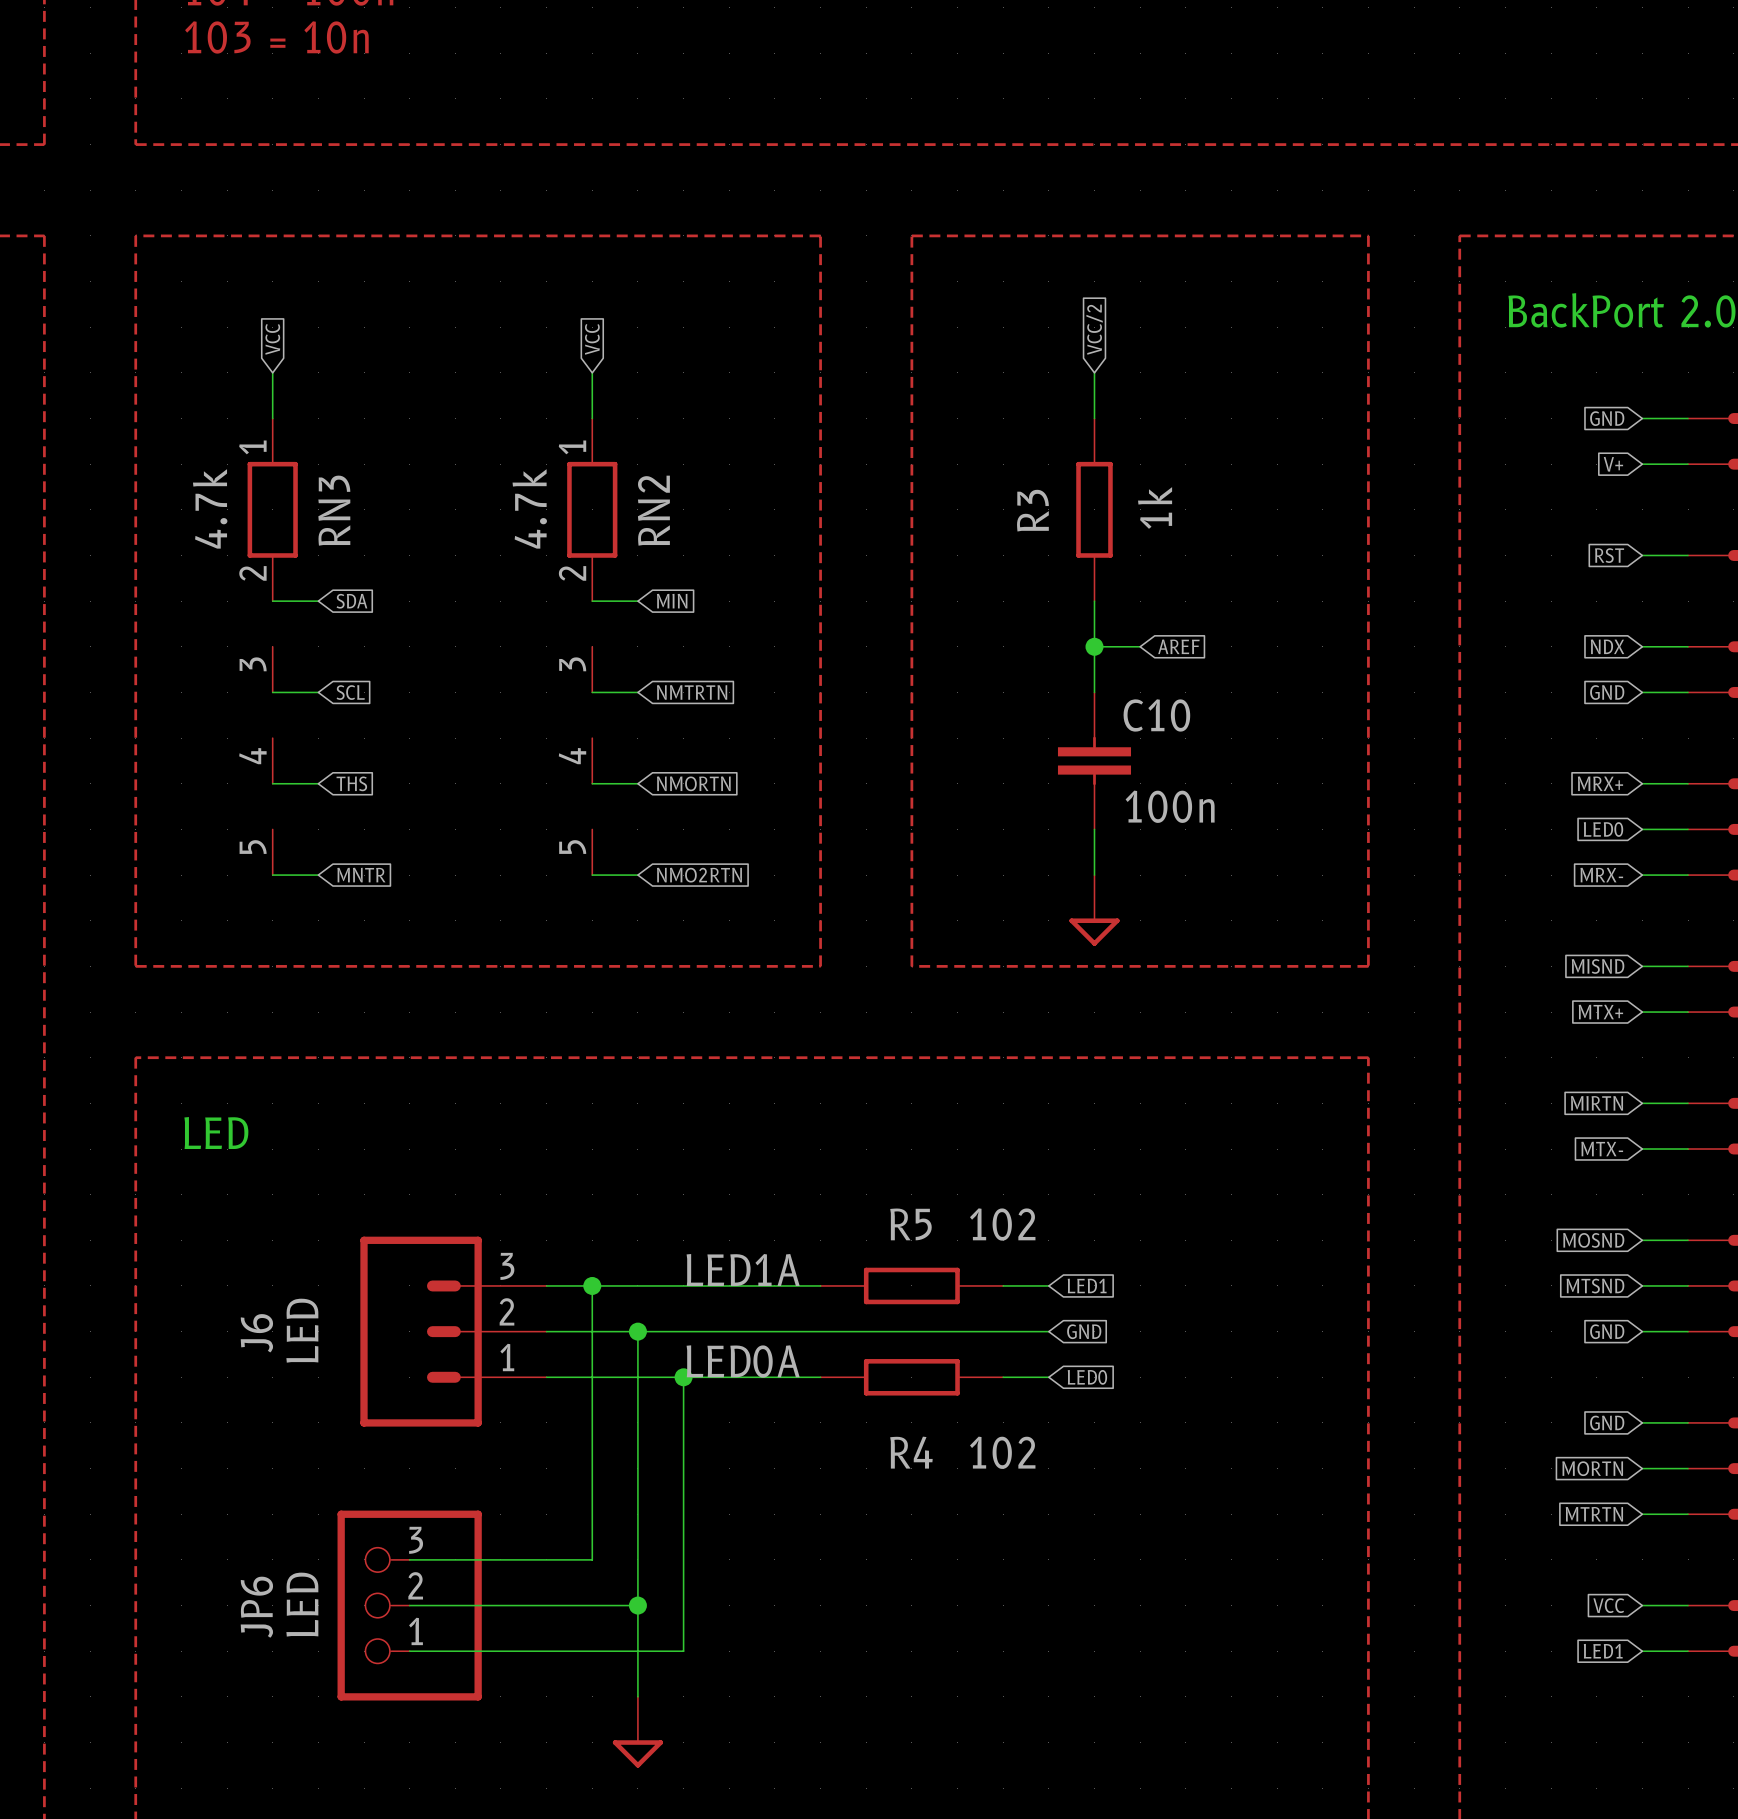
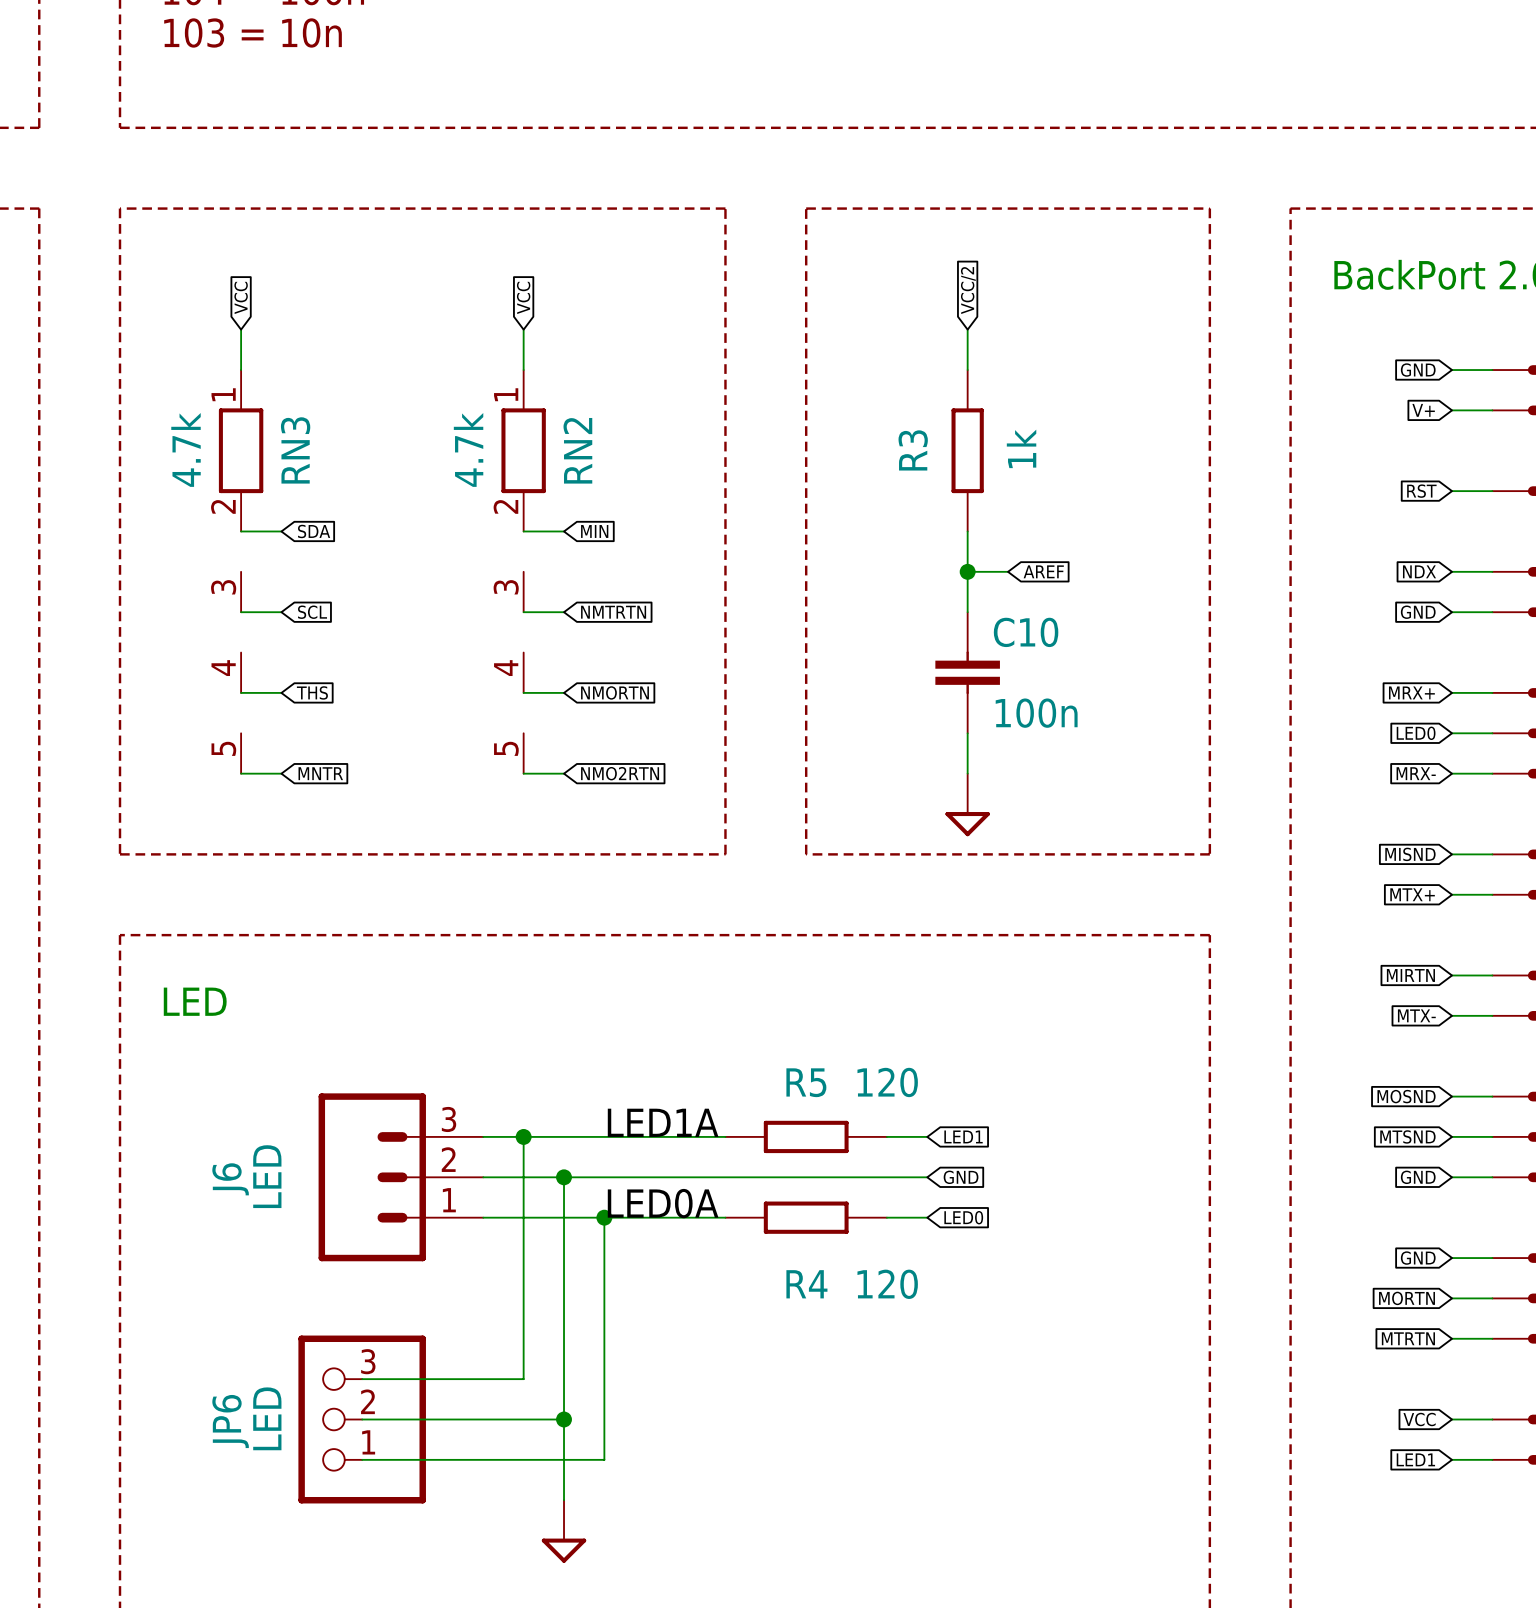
R5 value: 102 (1002, 1224) -> 120 (887, 1082)
R4 value: 102 (1002, 1452) -> 120 (887, 1284)

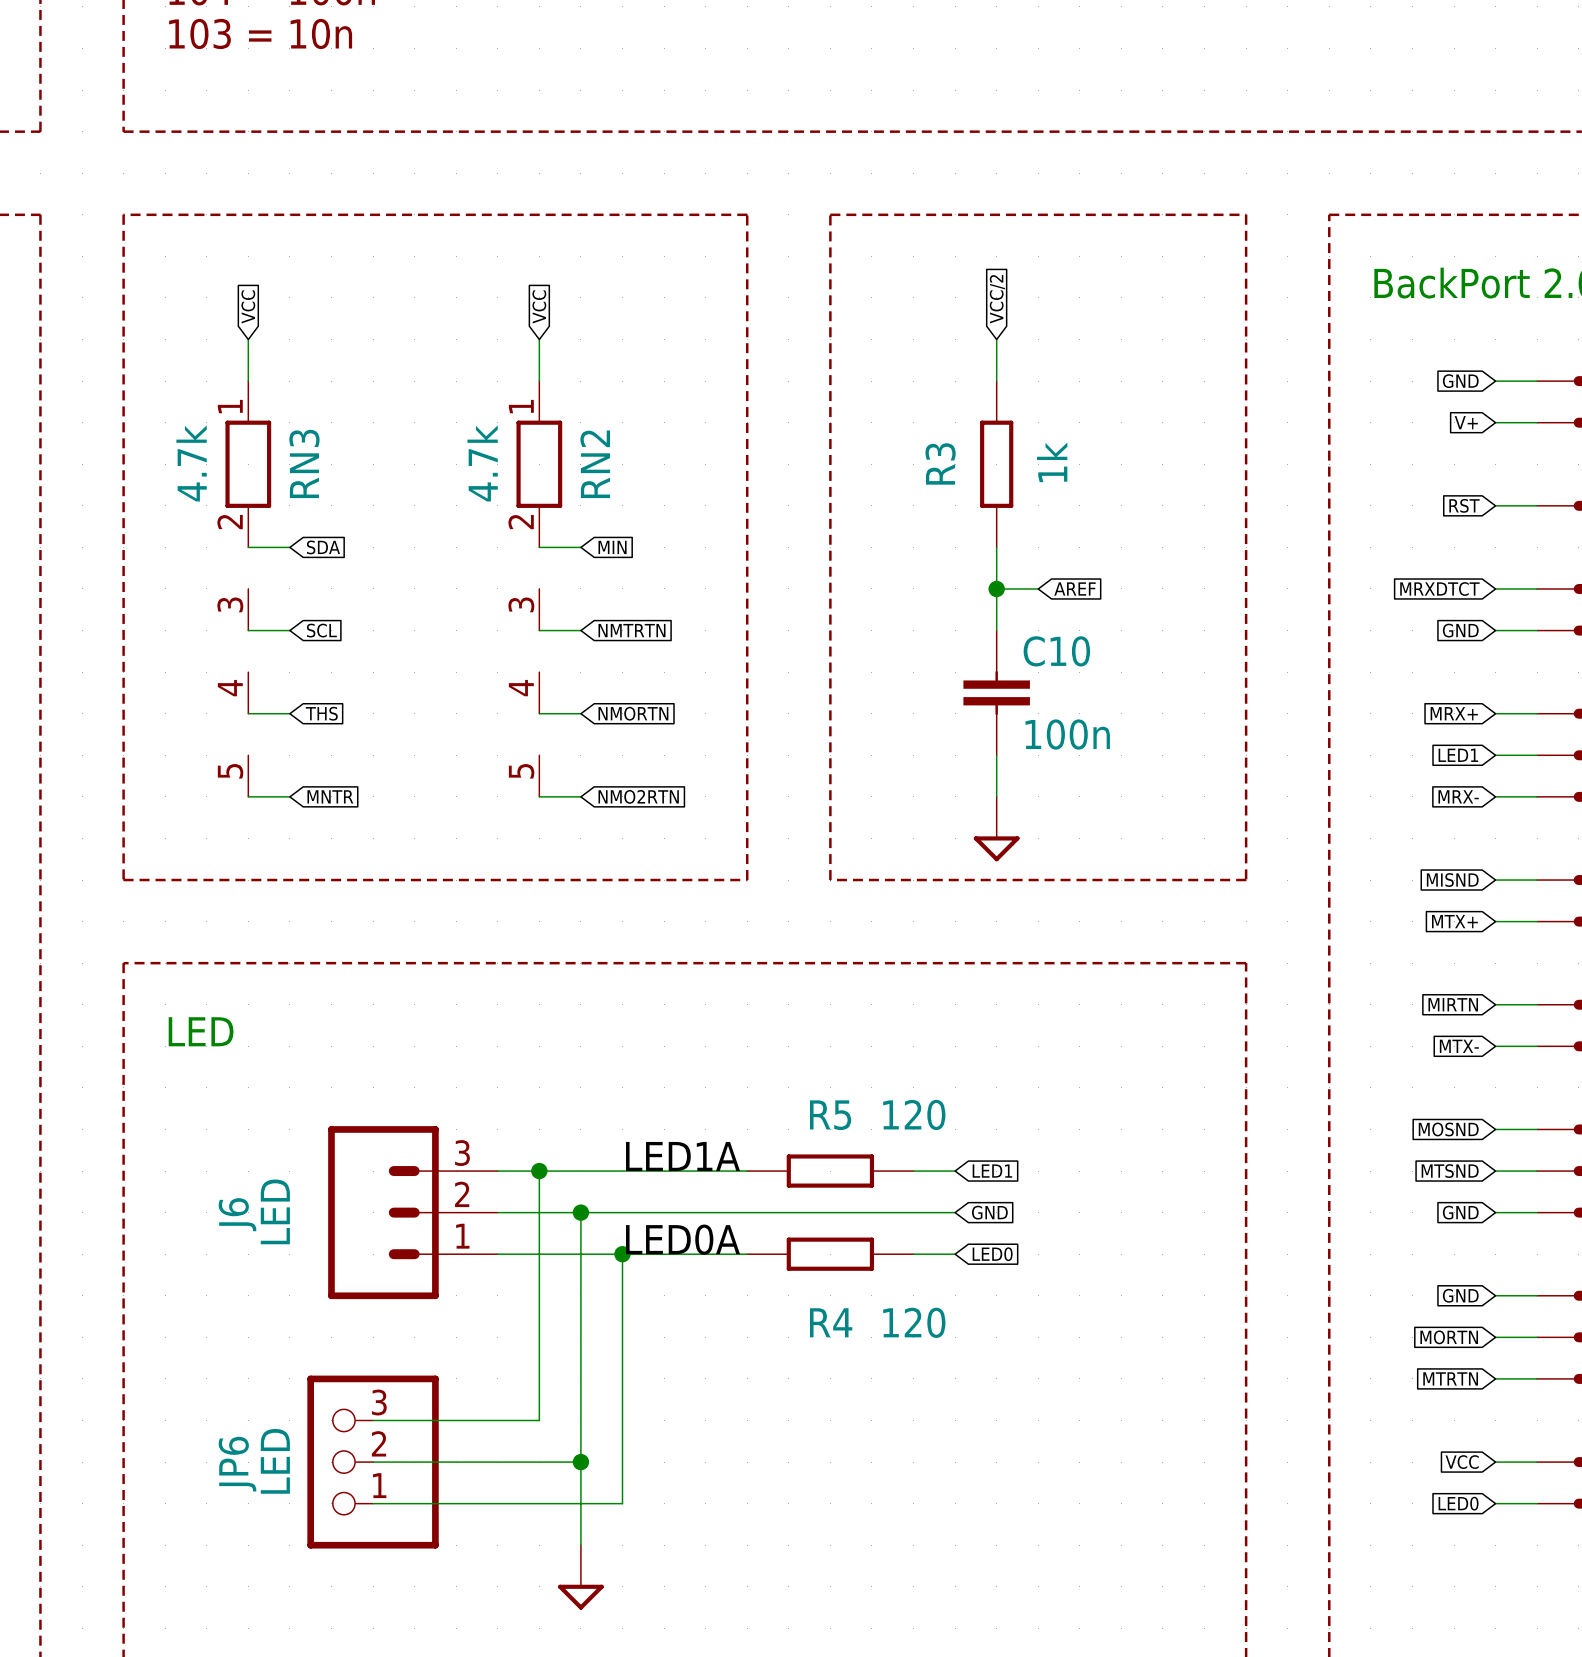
global label: NDX (1419, 571) -> MRXDTCT (1439, 589)
global label: LED0 (1416, 733) -> LED1 (1458, 755)
global label: LED1 (1415, 1459) -> LED0 (1458, 1503)

